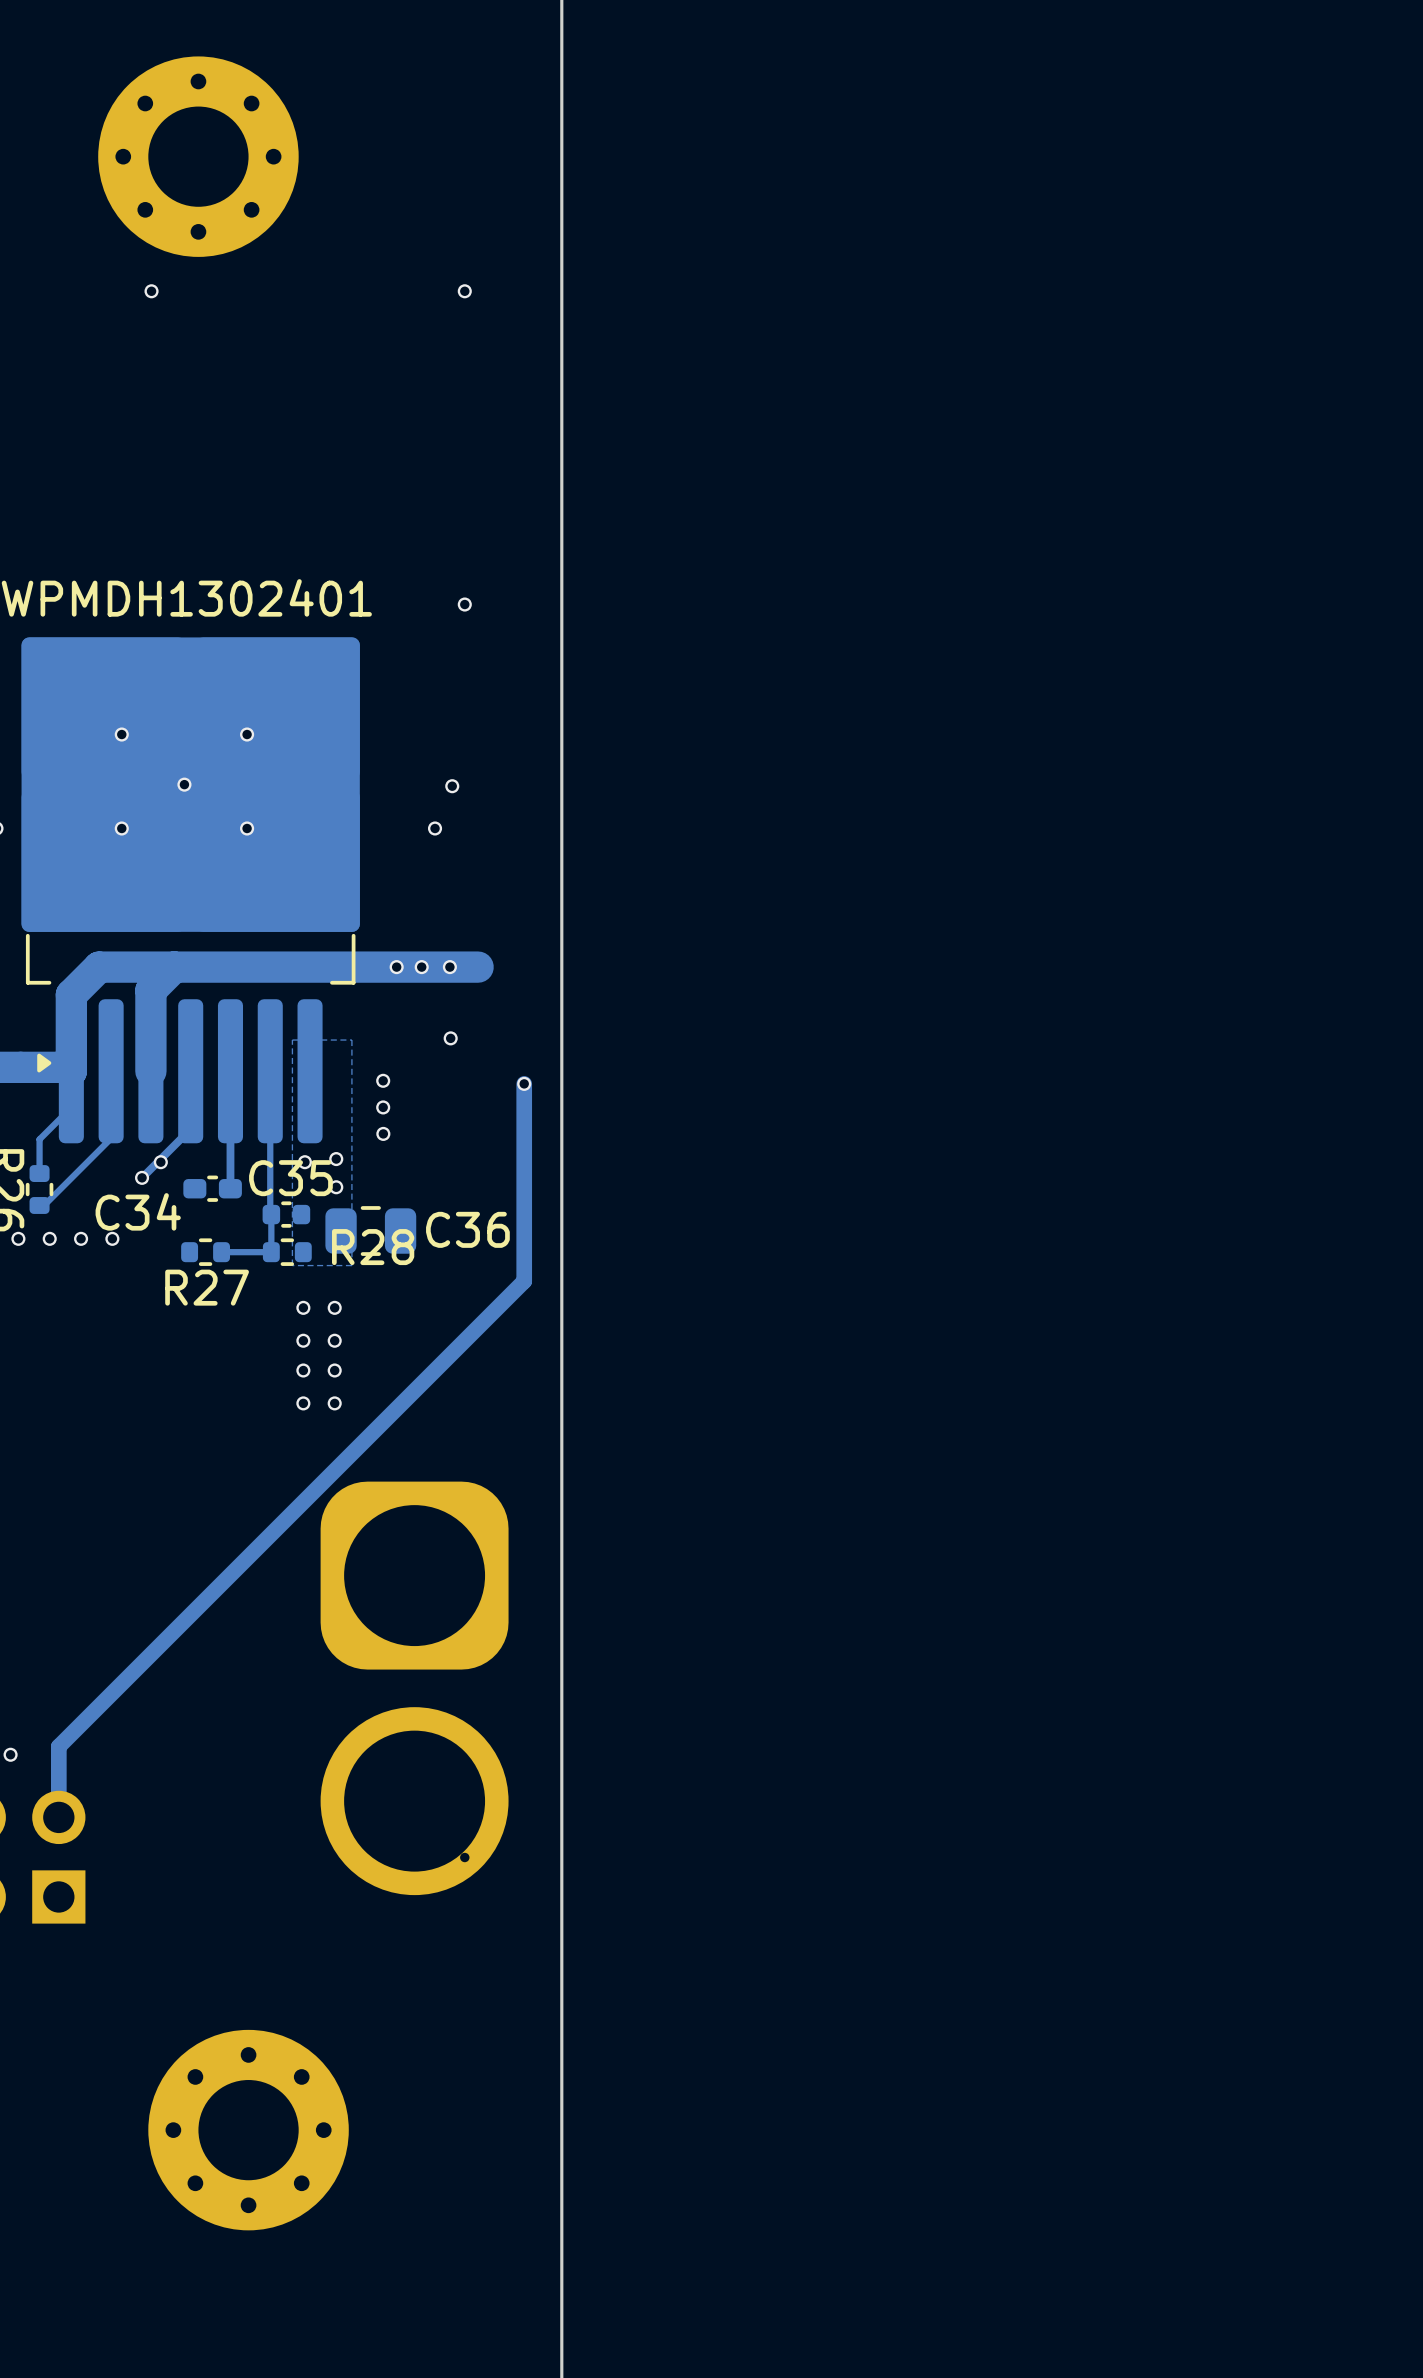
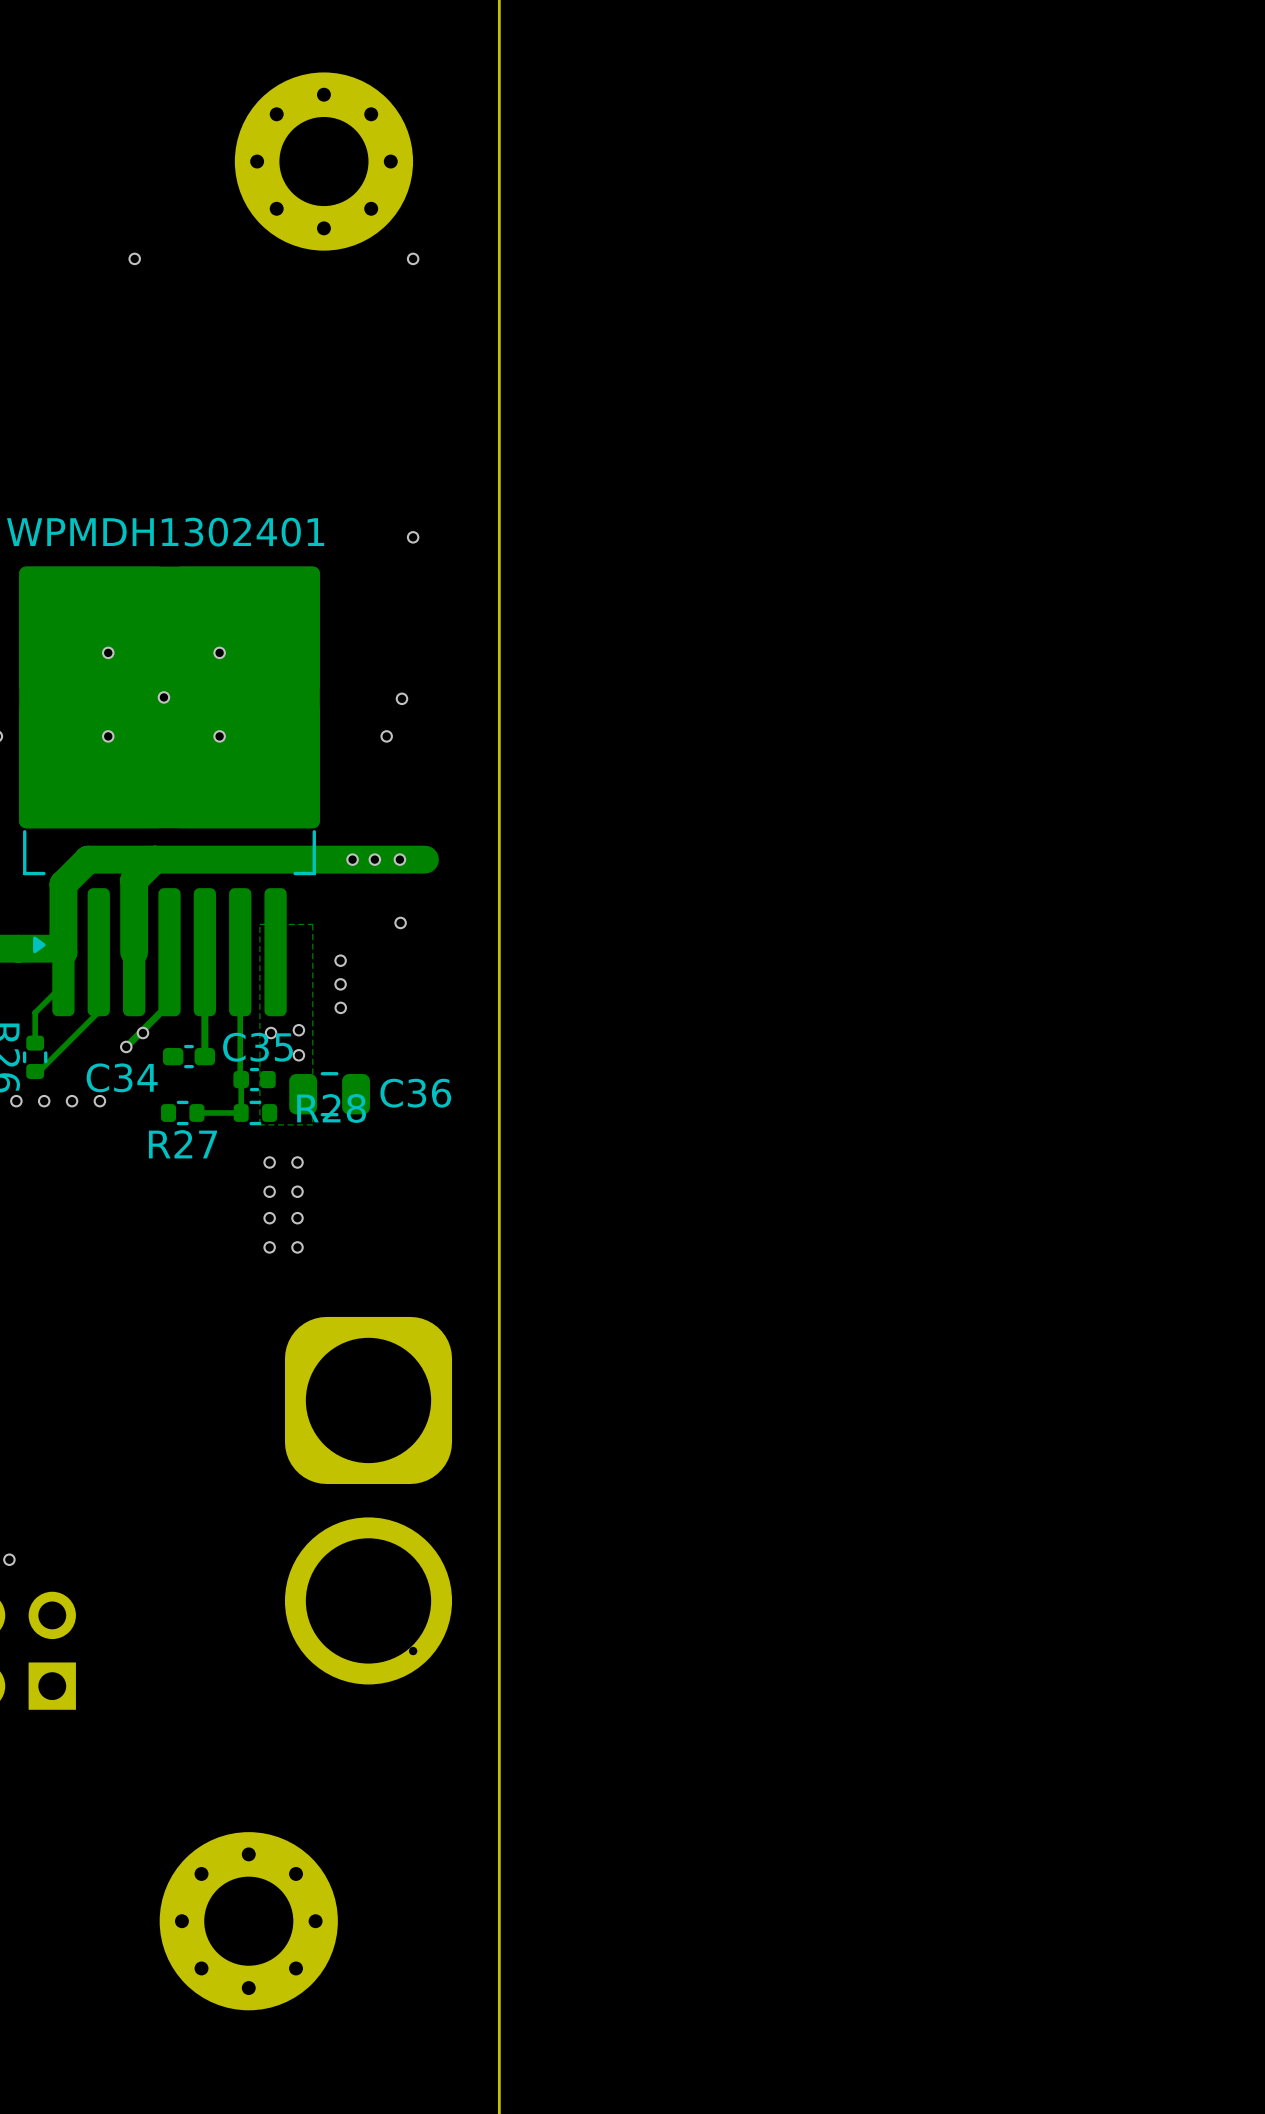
part position: (198, 156) -> (323, 161)
track: (524, 1083) (524, 1281) (58, 1746) (58, 1817) -> none
via: (524, 1083) -> none
part position: (248, 2130) -> (248, 1921)

